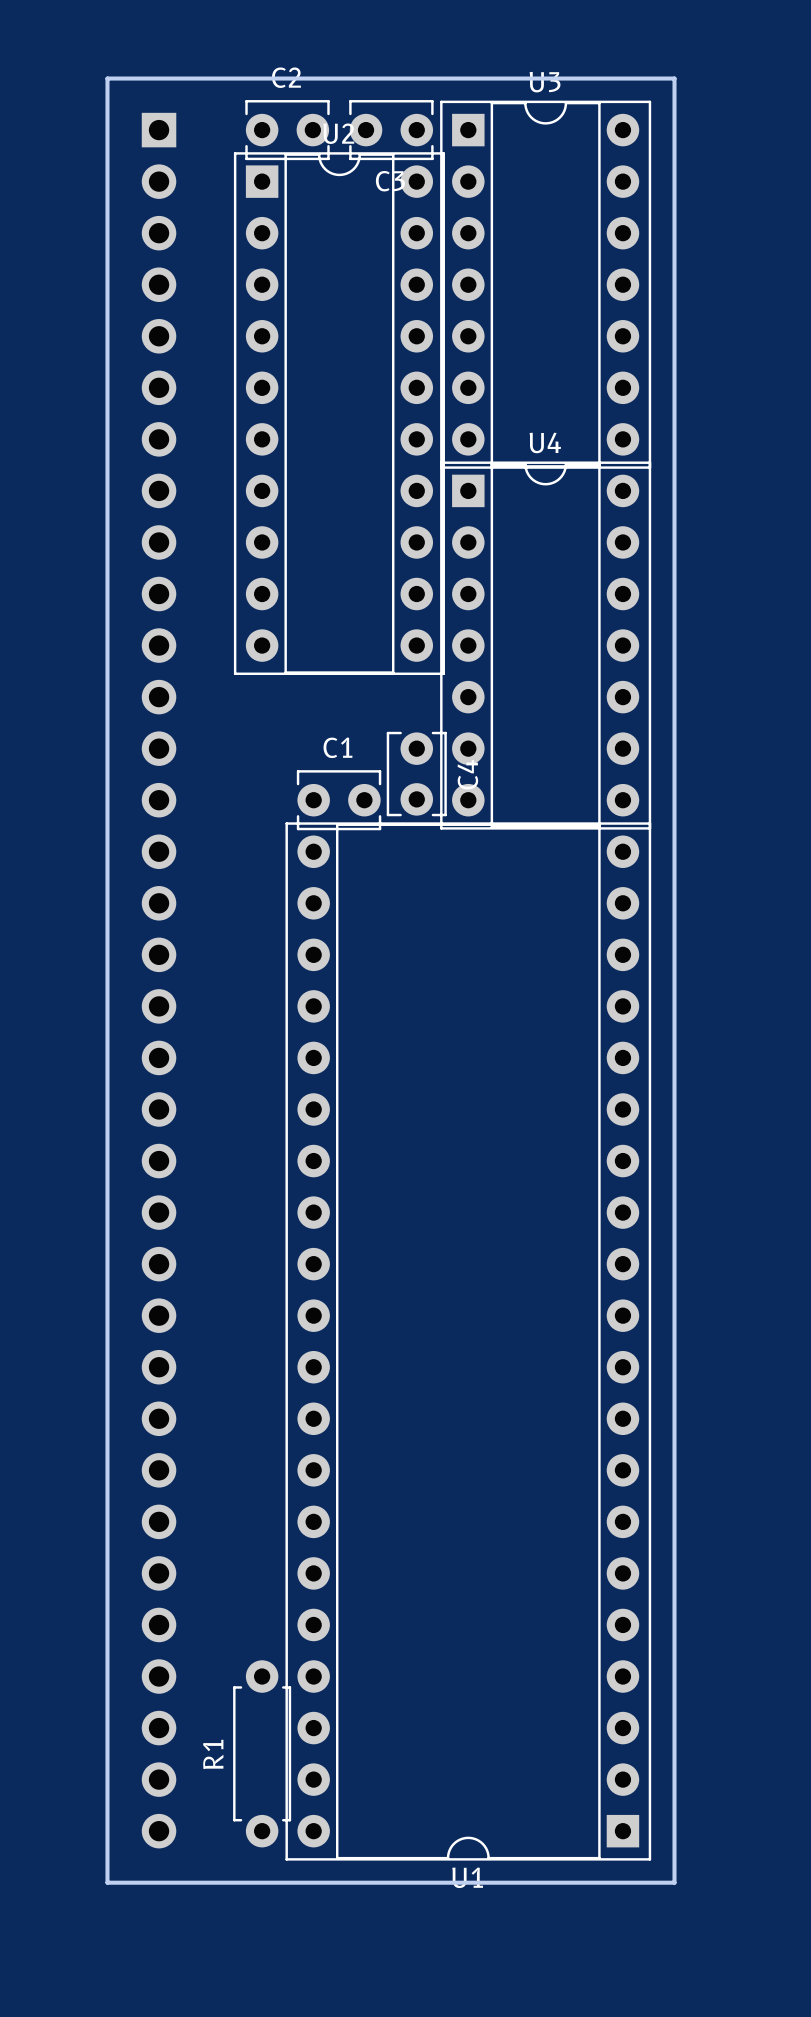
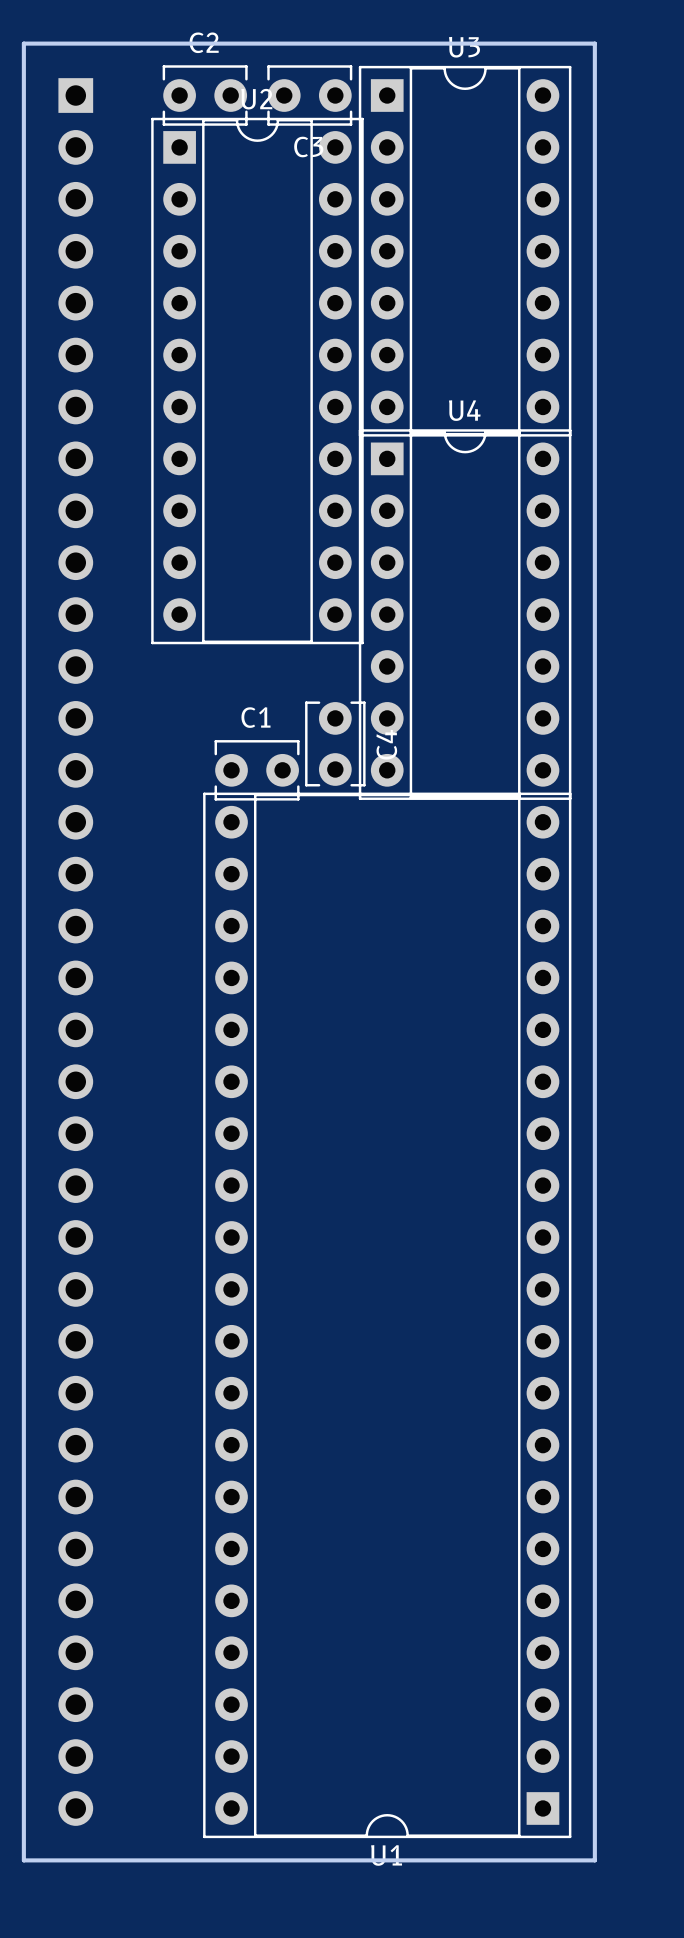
R1: (262, 1753) -> none

